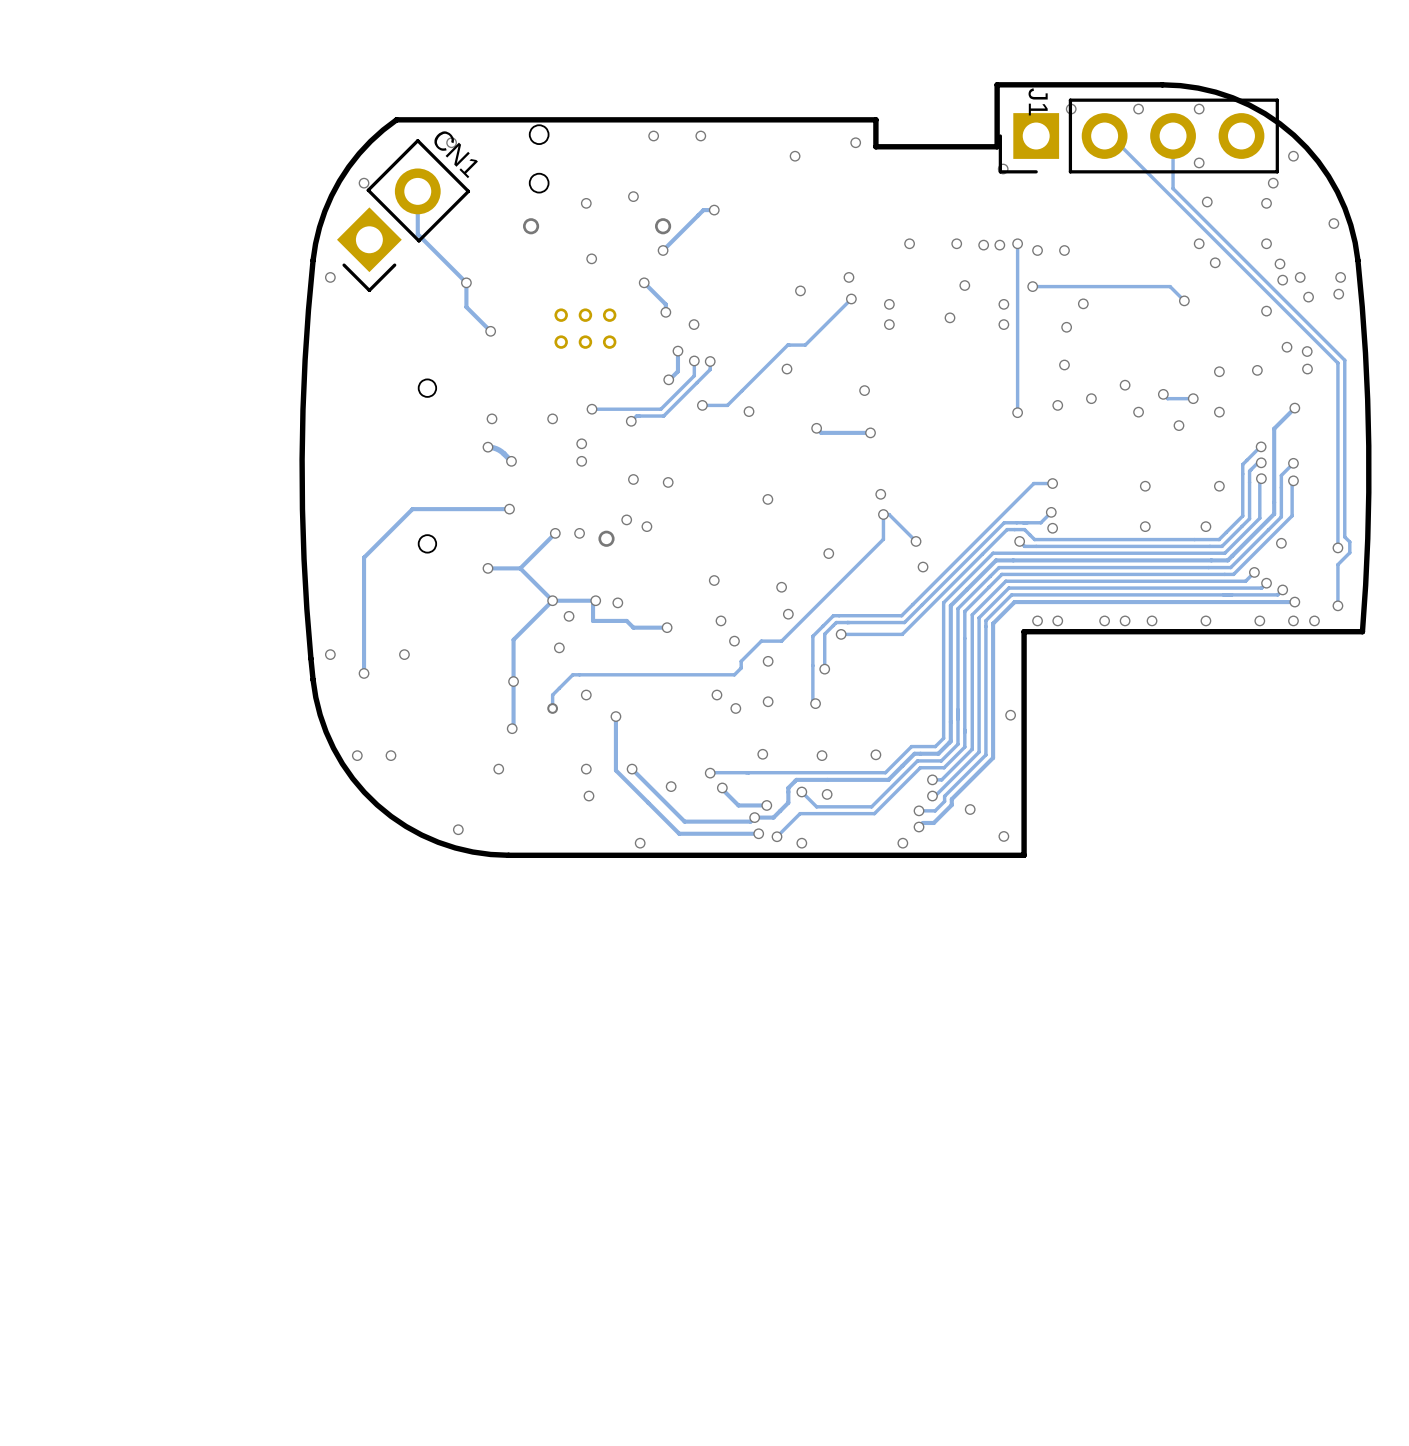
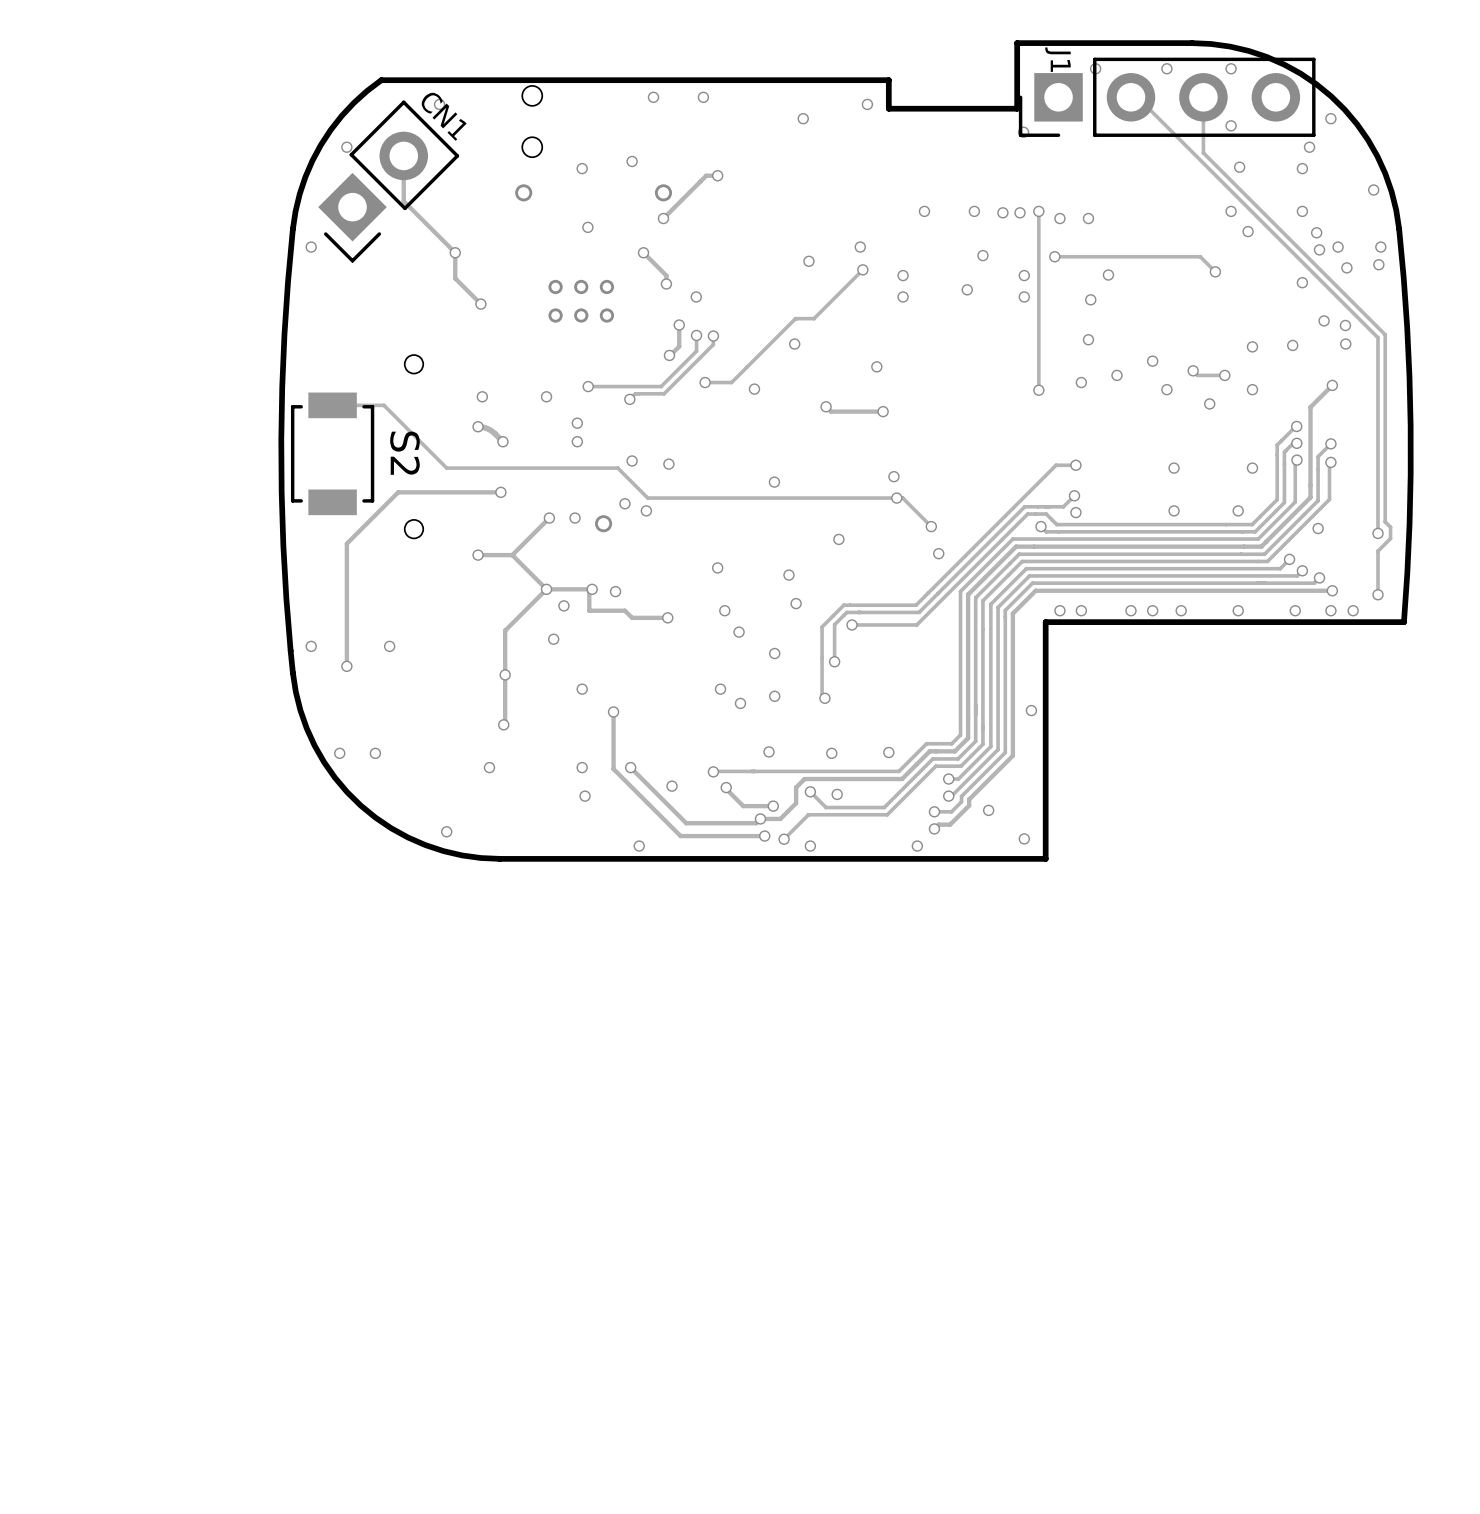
S2: none -> (332, 453)
track: (883, 514) (883, 539) (781, 641) (761, 641) (741, 661) (741, 668) (734, 674) (572, 674) (552, 695) (552, 708) -> (896, 498) (647, 498) (617, 468) (446, 468) (383, 405) (332, 405)
via: (552, 708) -> none

